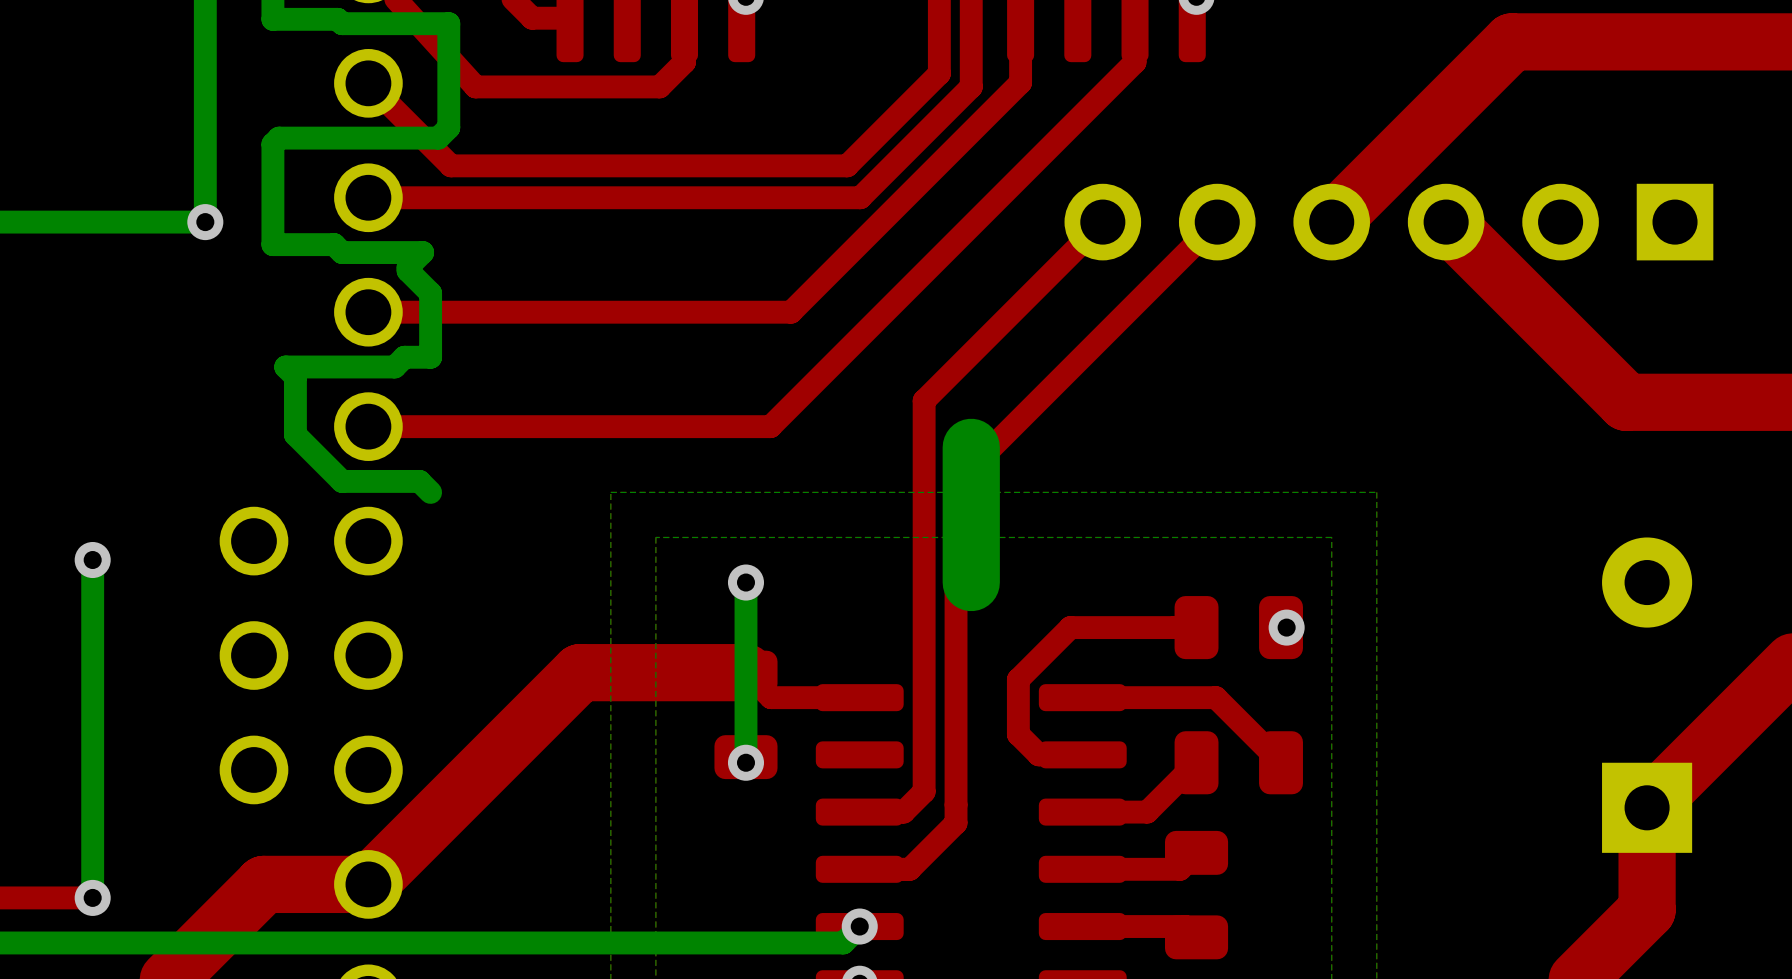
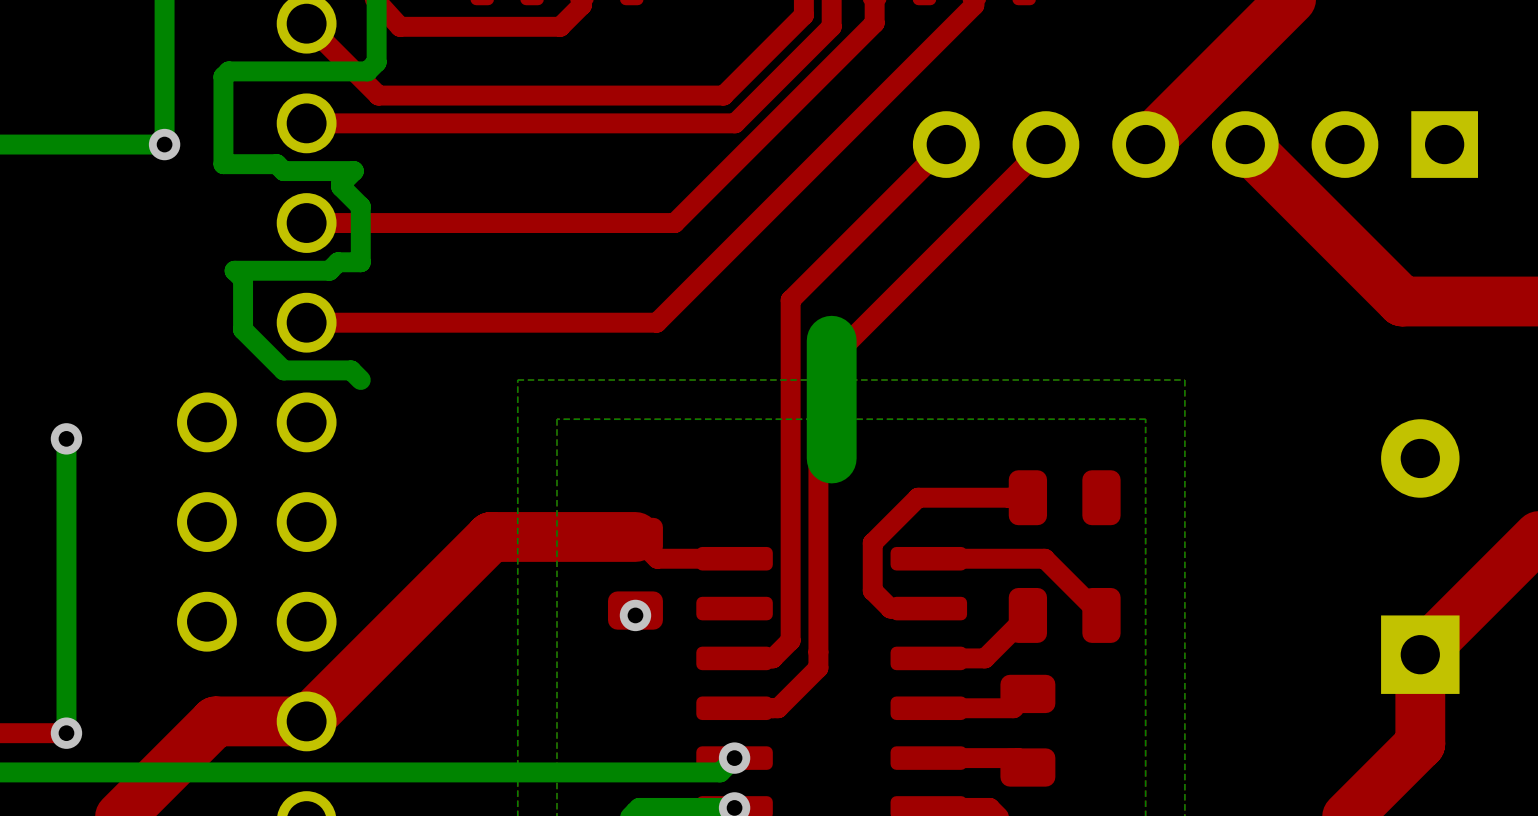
bottom track: (745, 582) (745, 762) -> none
via: (745, 582) -> none
via: (1286, 627) -> none

